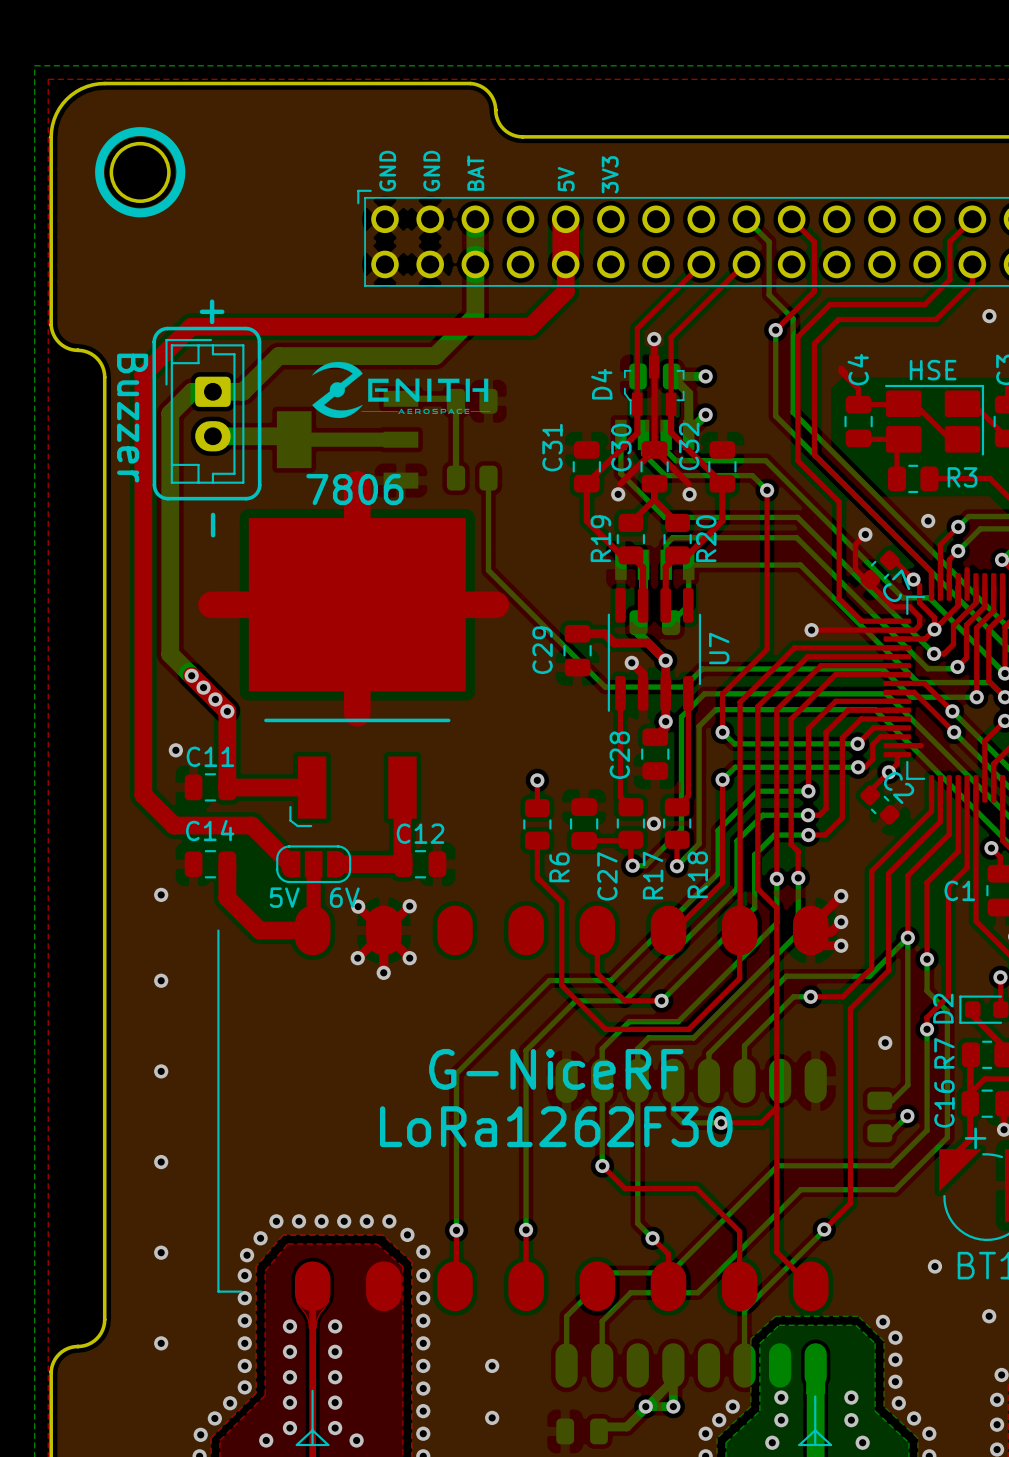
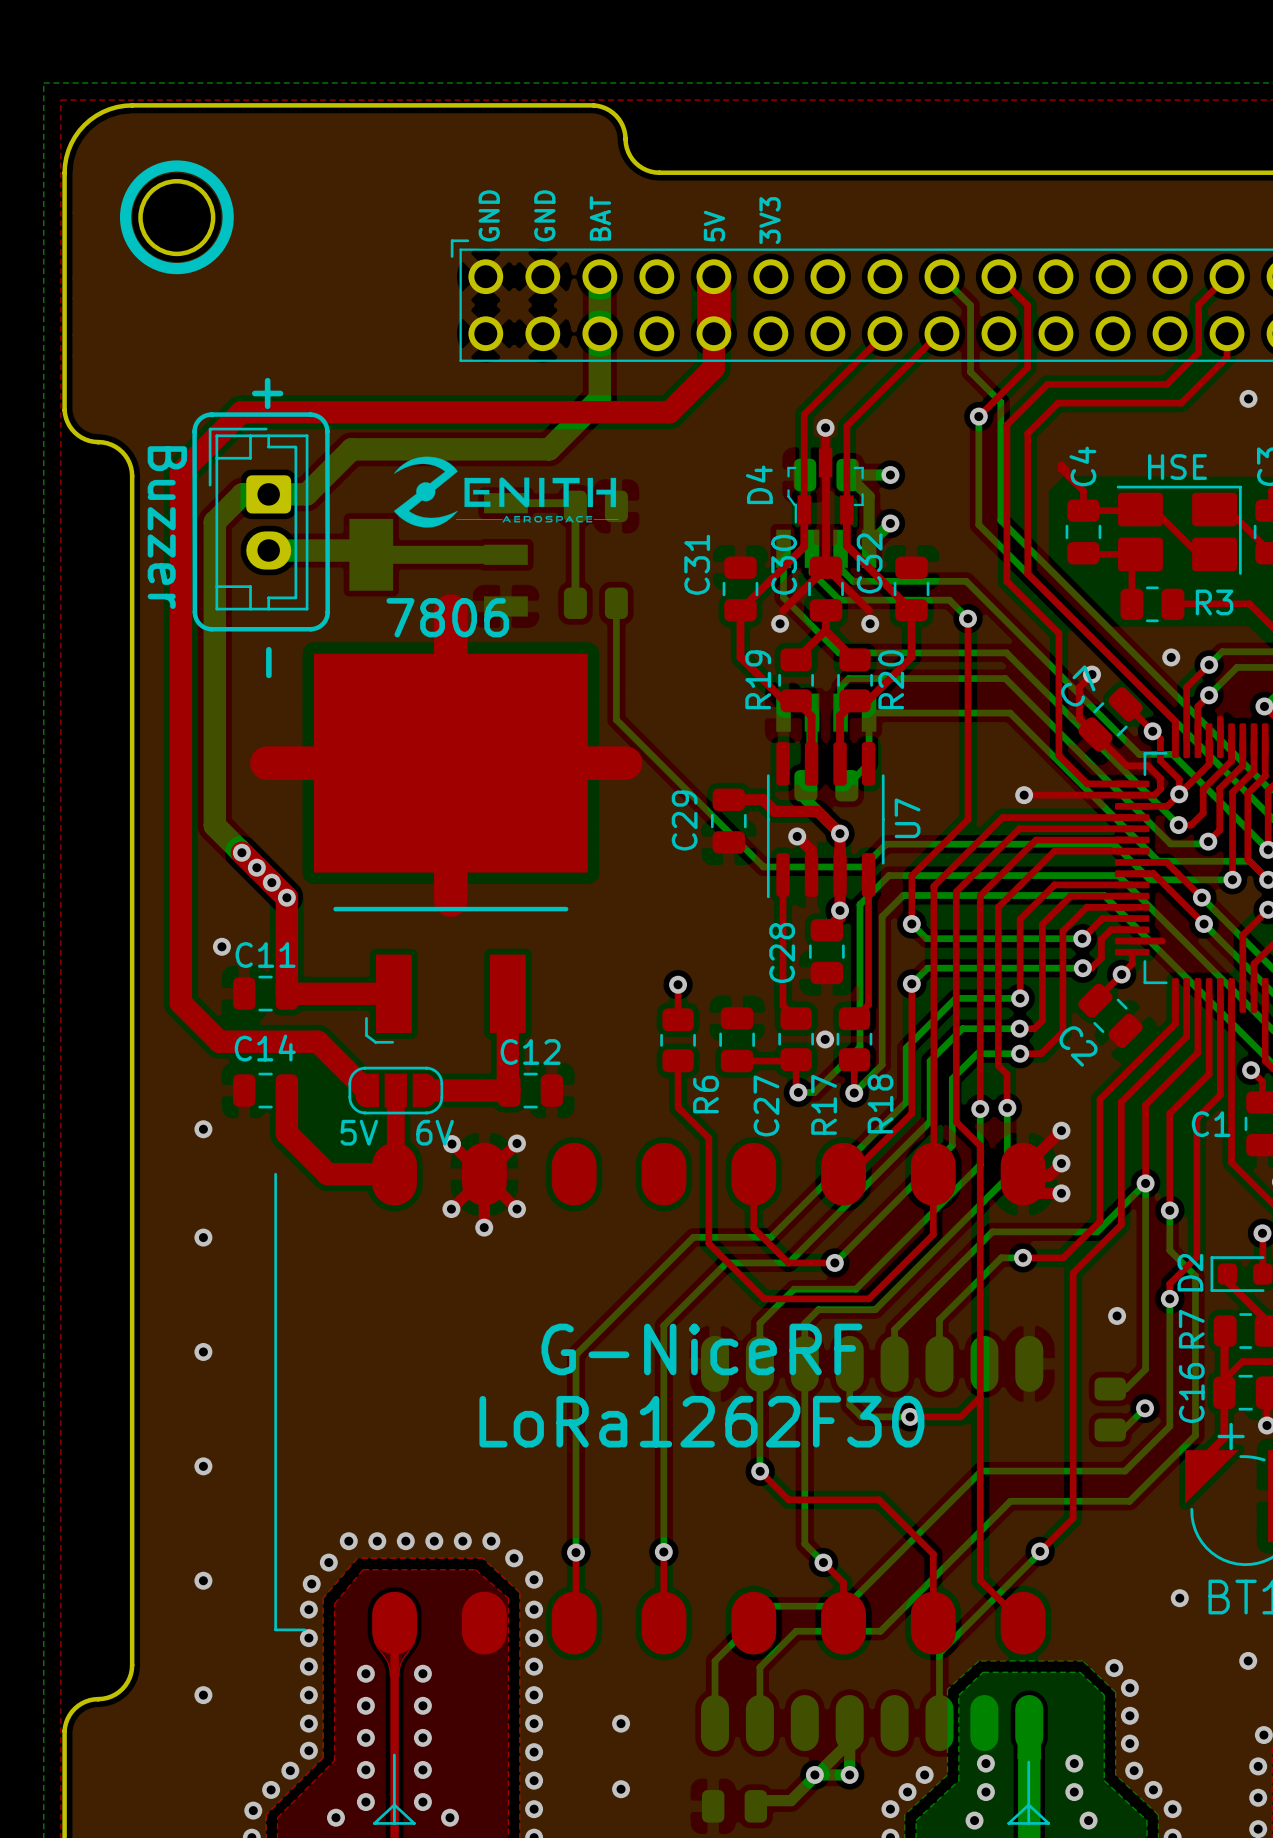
C7 footprint: [860, 550, 900, 590] -> [1078, 687, 1143, 752]
C7 name position: C7 (896, 585) -> C7 (1078, 685)
C2 footprint: [860, 785, 900, 825] -> [1078, 983, 1143, 1048]
C2 name position: C2 (899, 788) -> C2 (1078, 1046)

